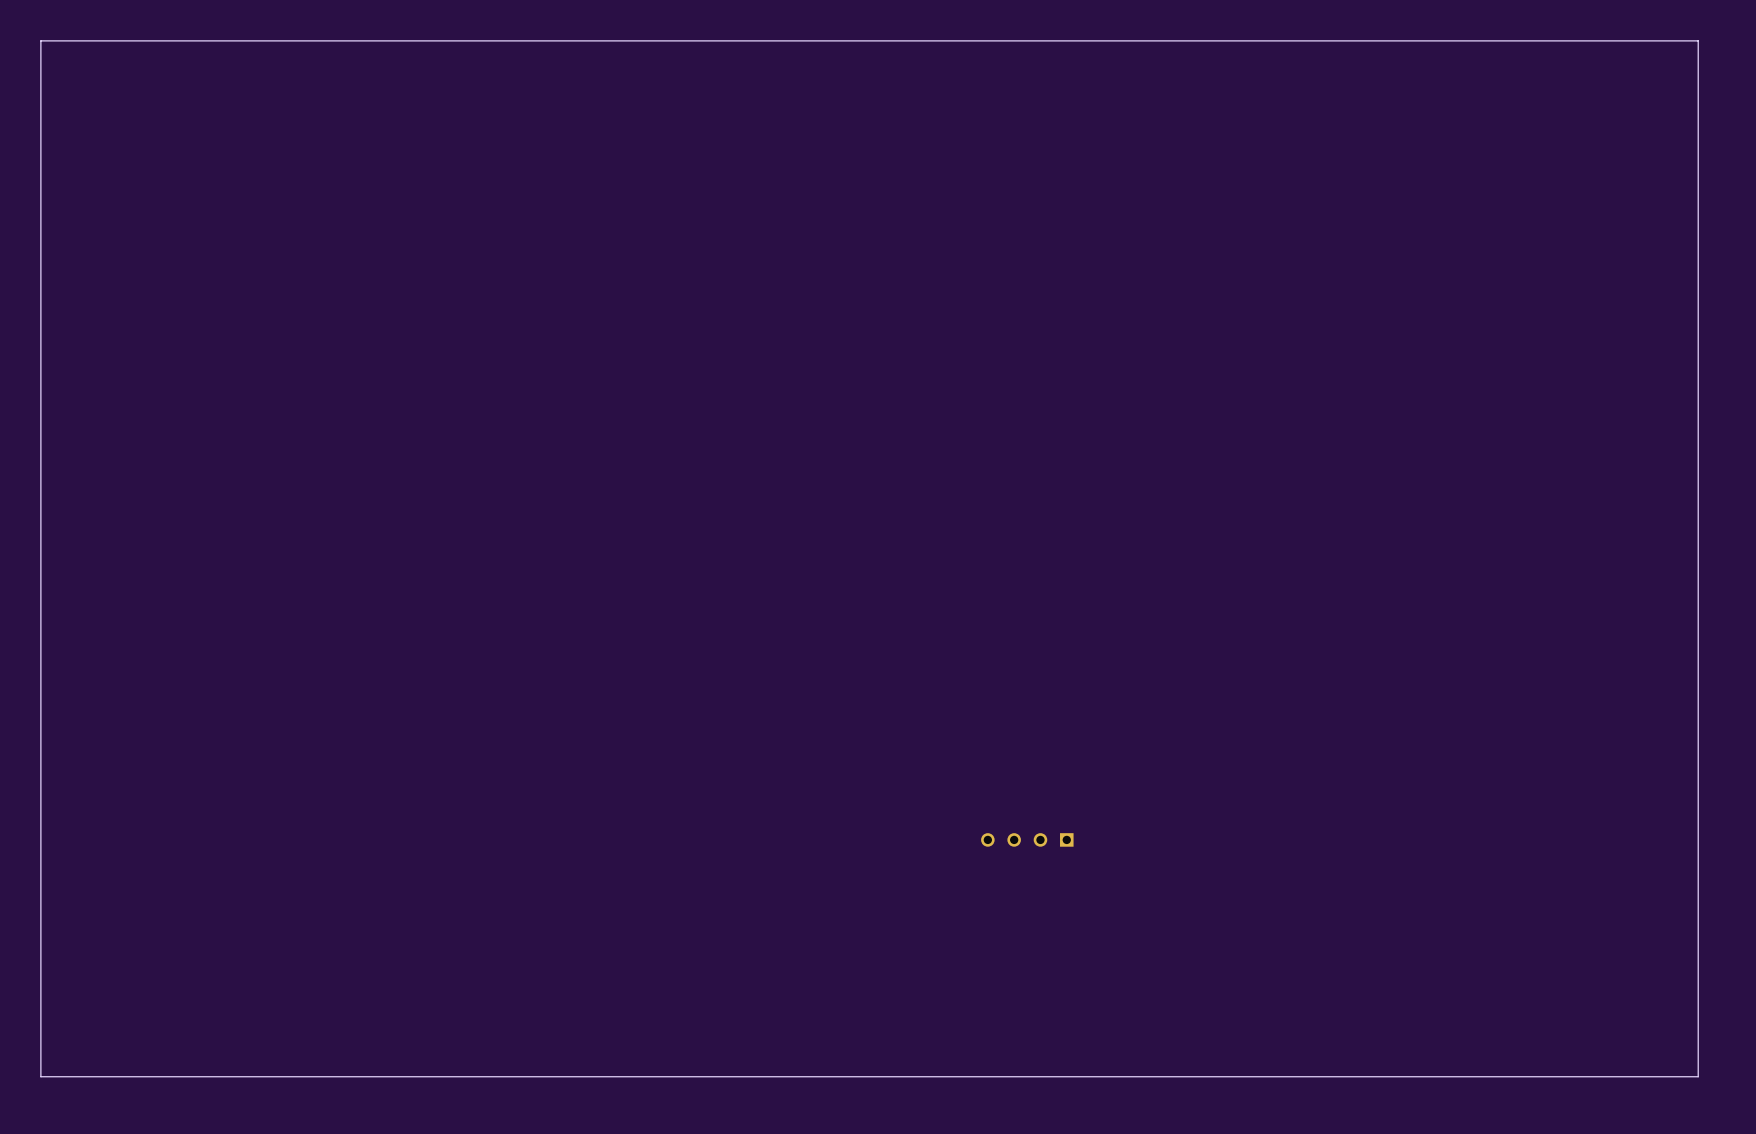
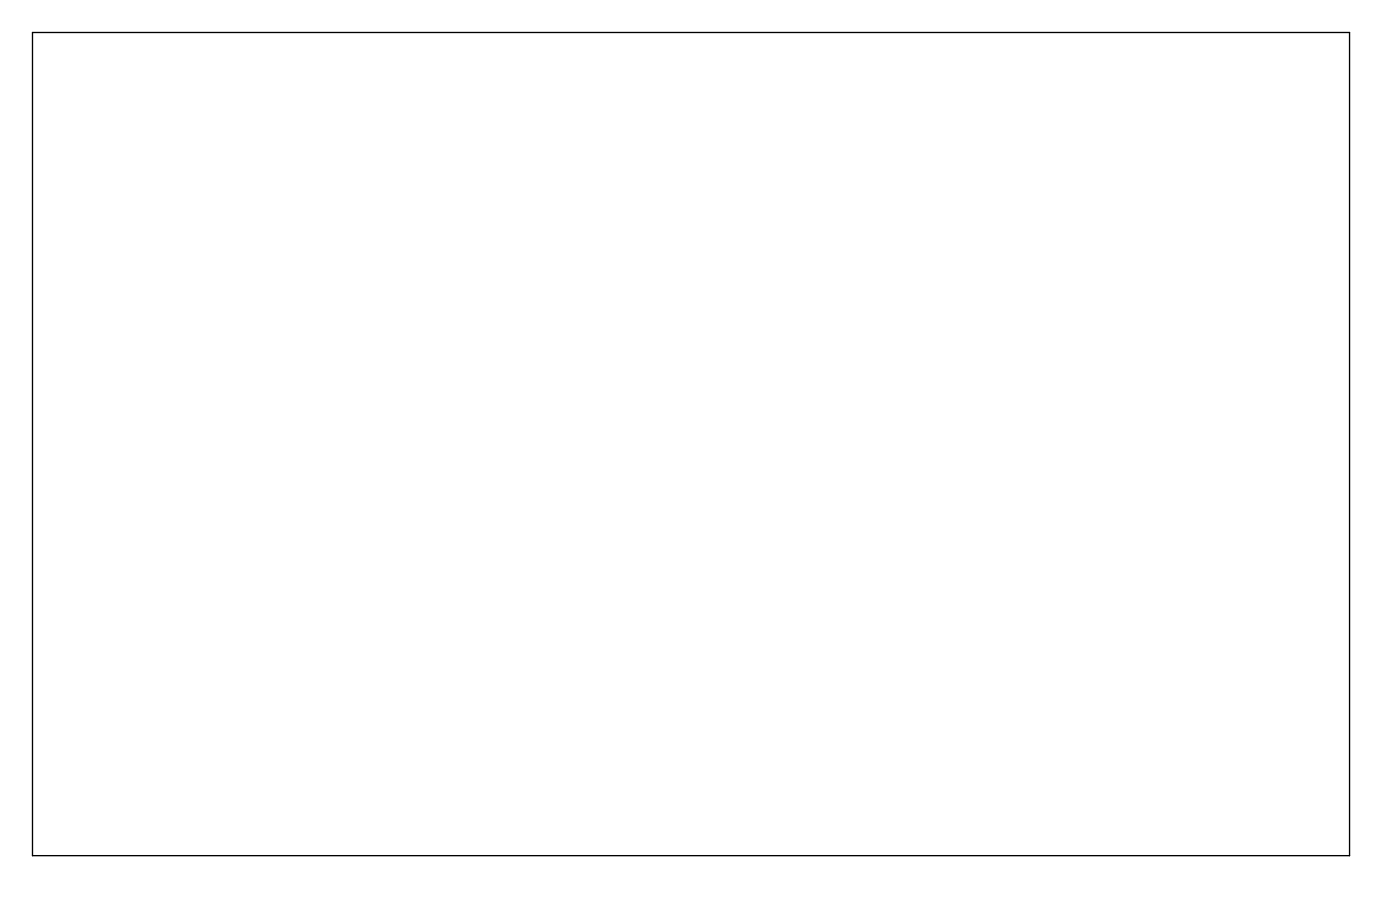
part: (1027, 839) -> none

